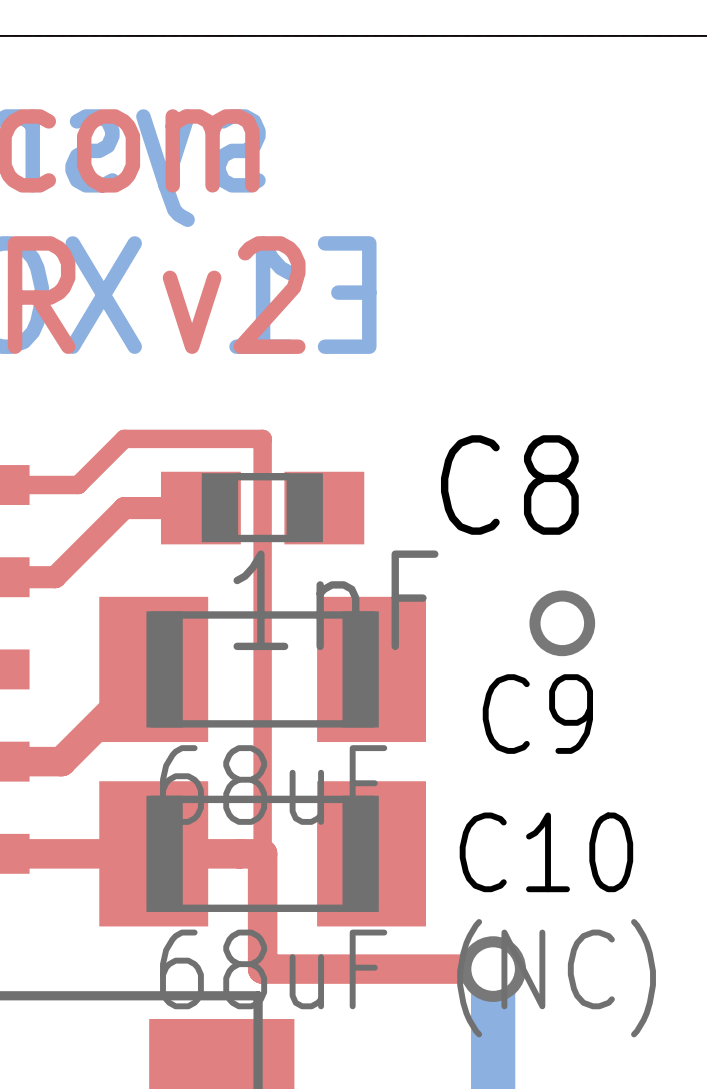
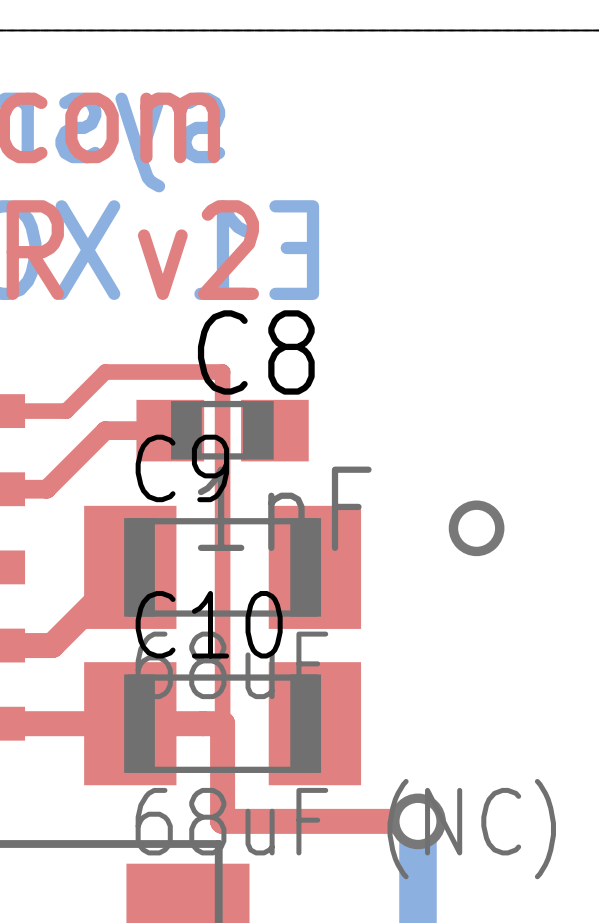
C8 name position: C8 (509, 485) -> C8 (256, 352)
C9 name position: C9 (537, 714) -> C9 (182, 468)
C10 name position: C10 (546, 852) -> C10 (209, 624)

